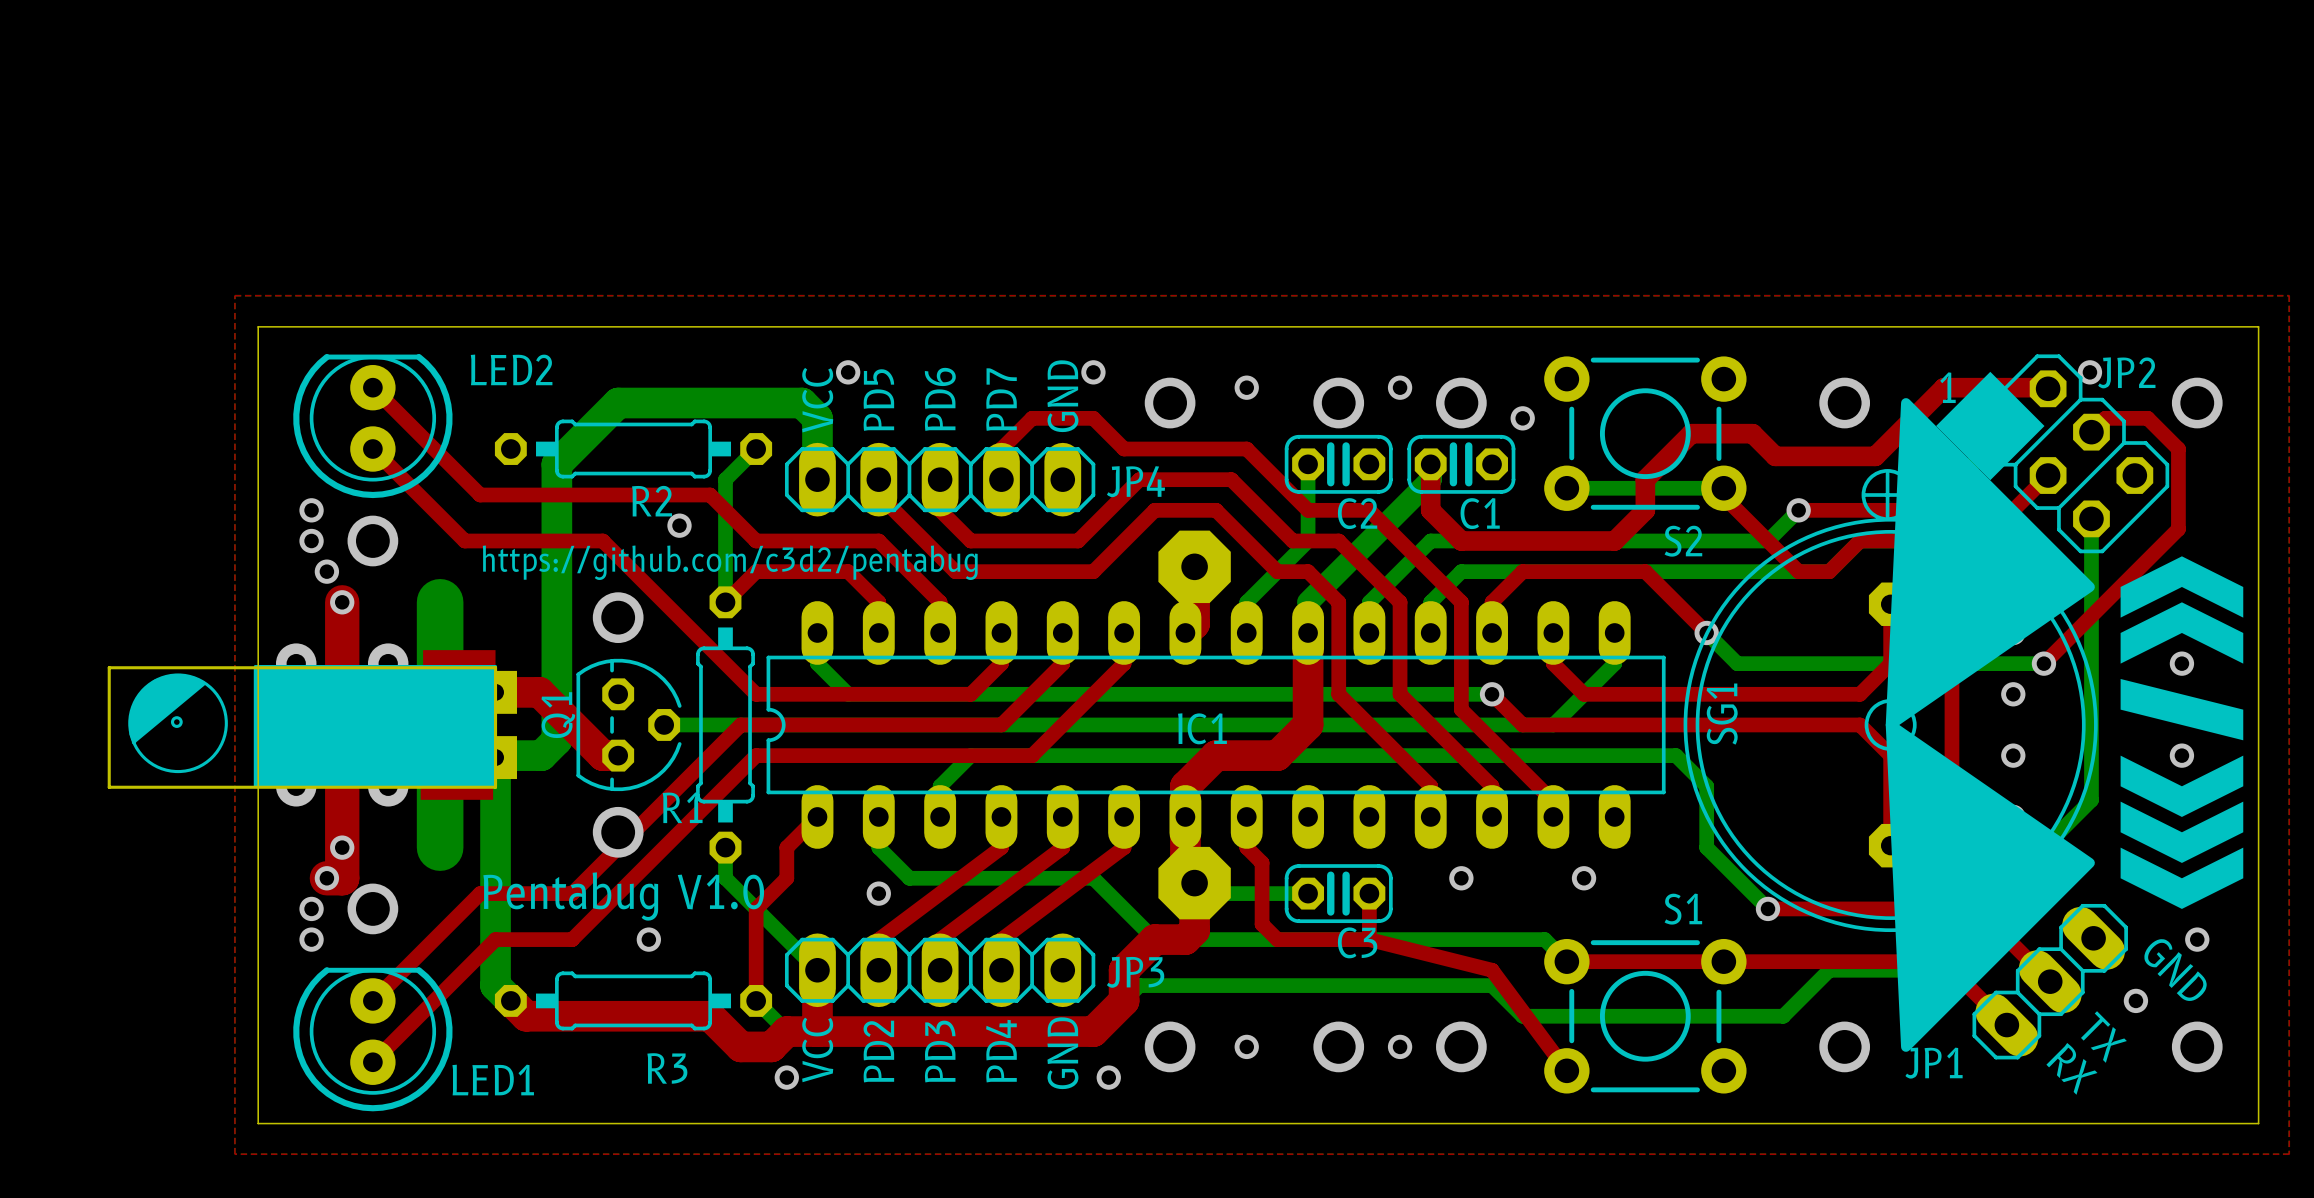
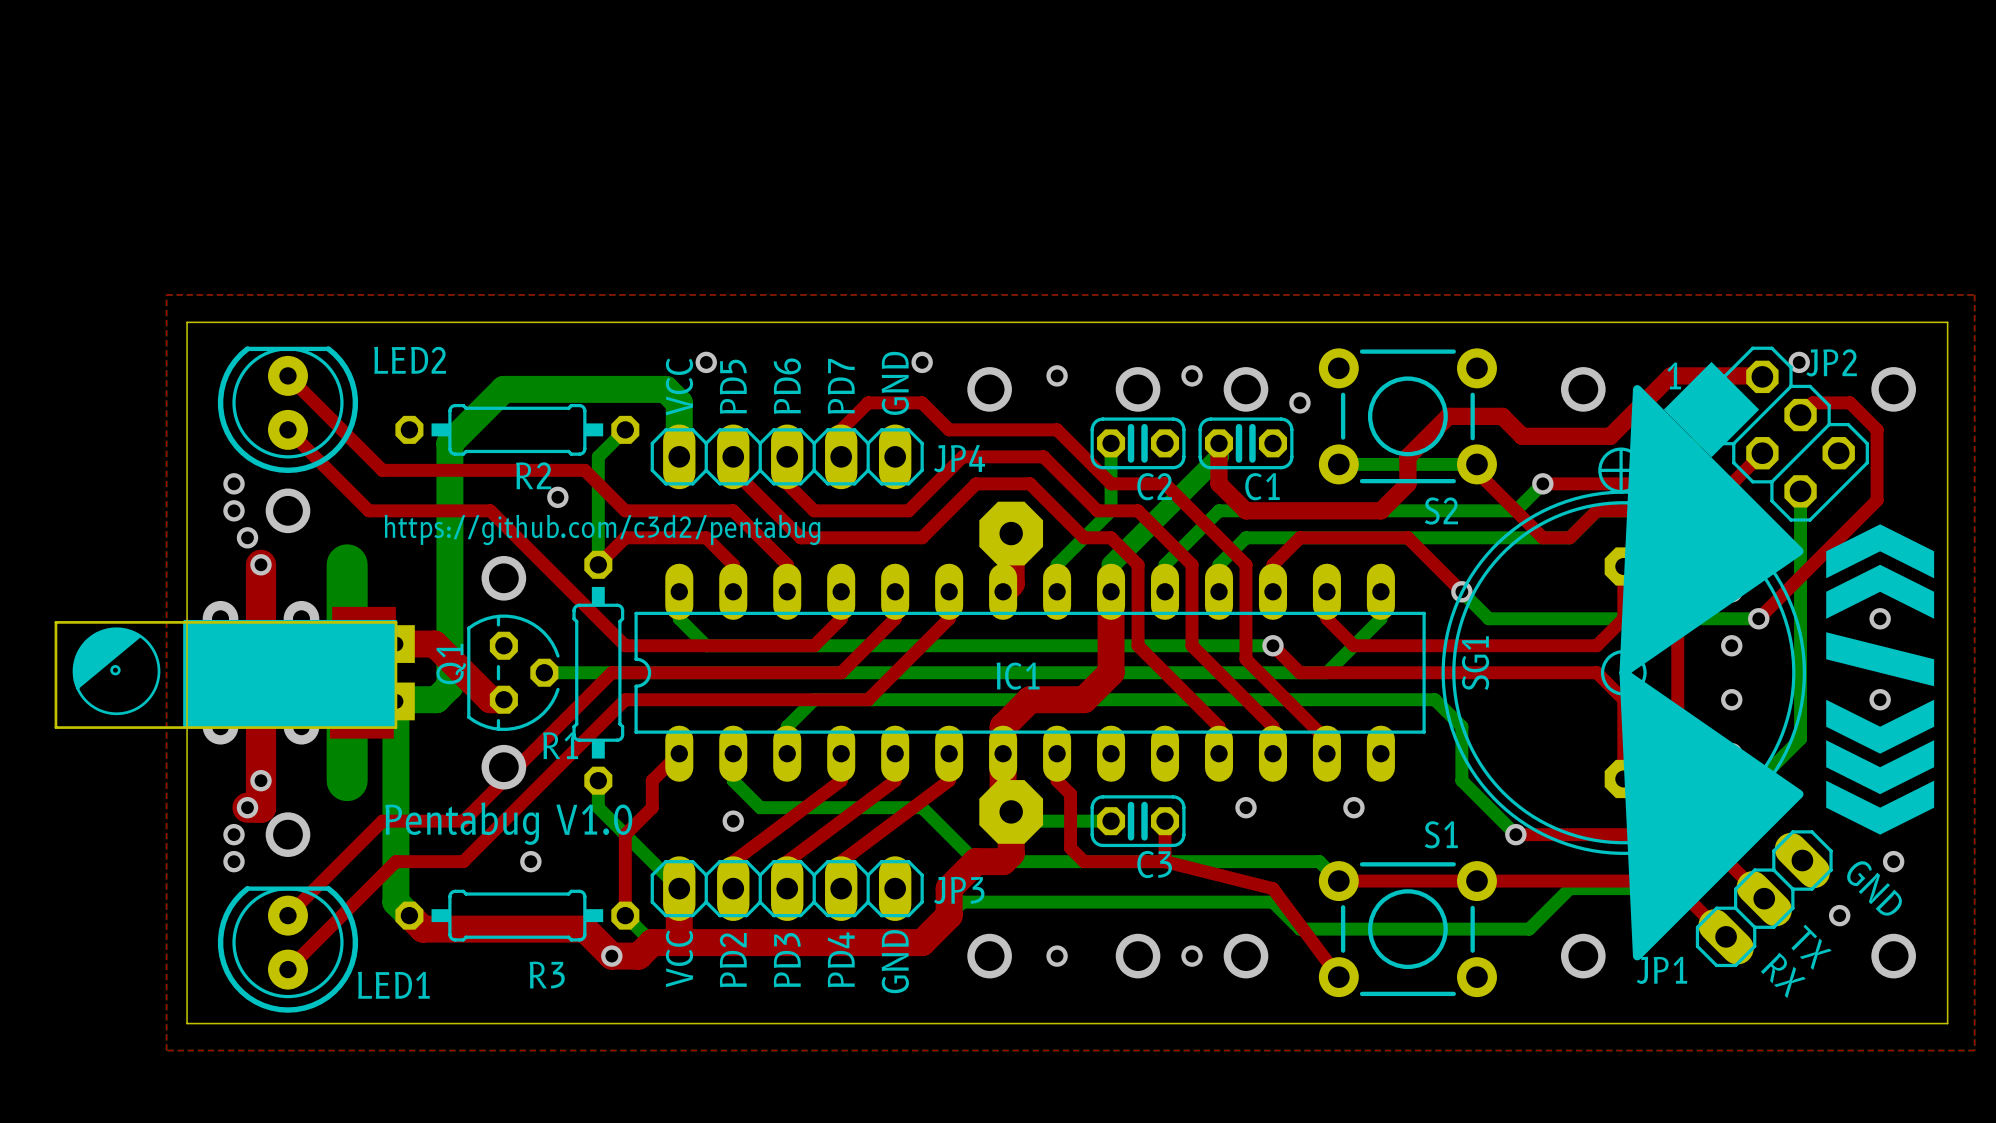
via position: (786, 1077) -> (611, 956)
via: (1108, 1077) -> none

